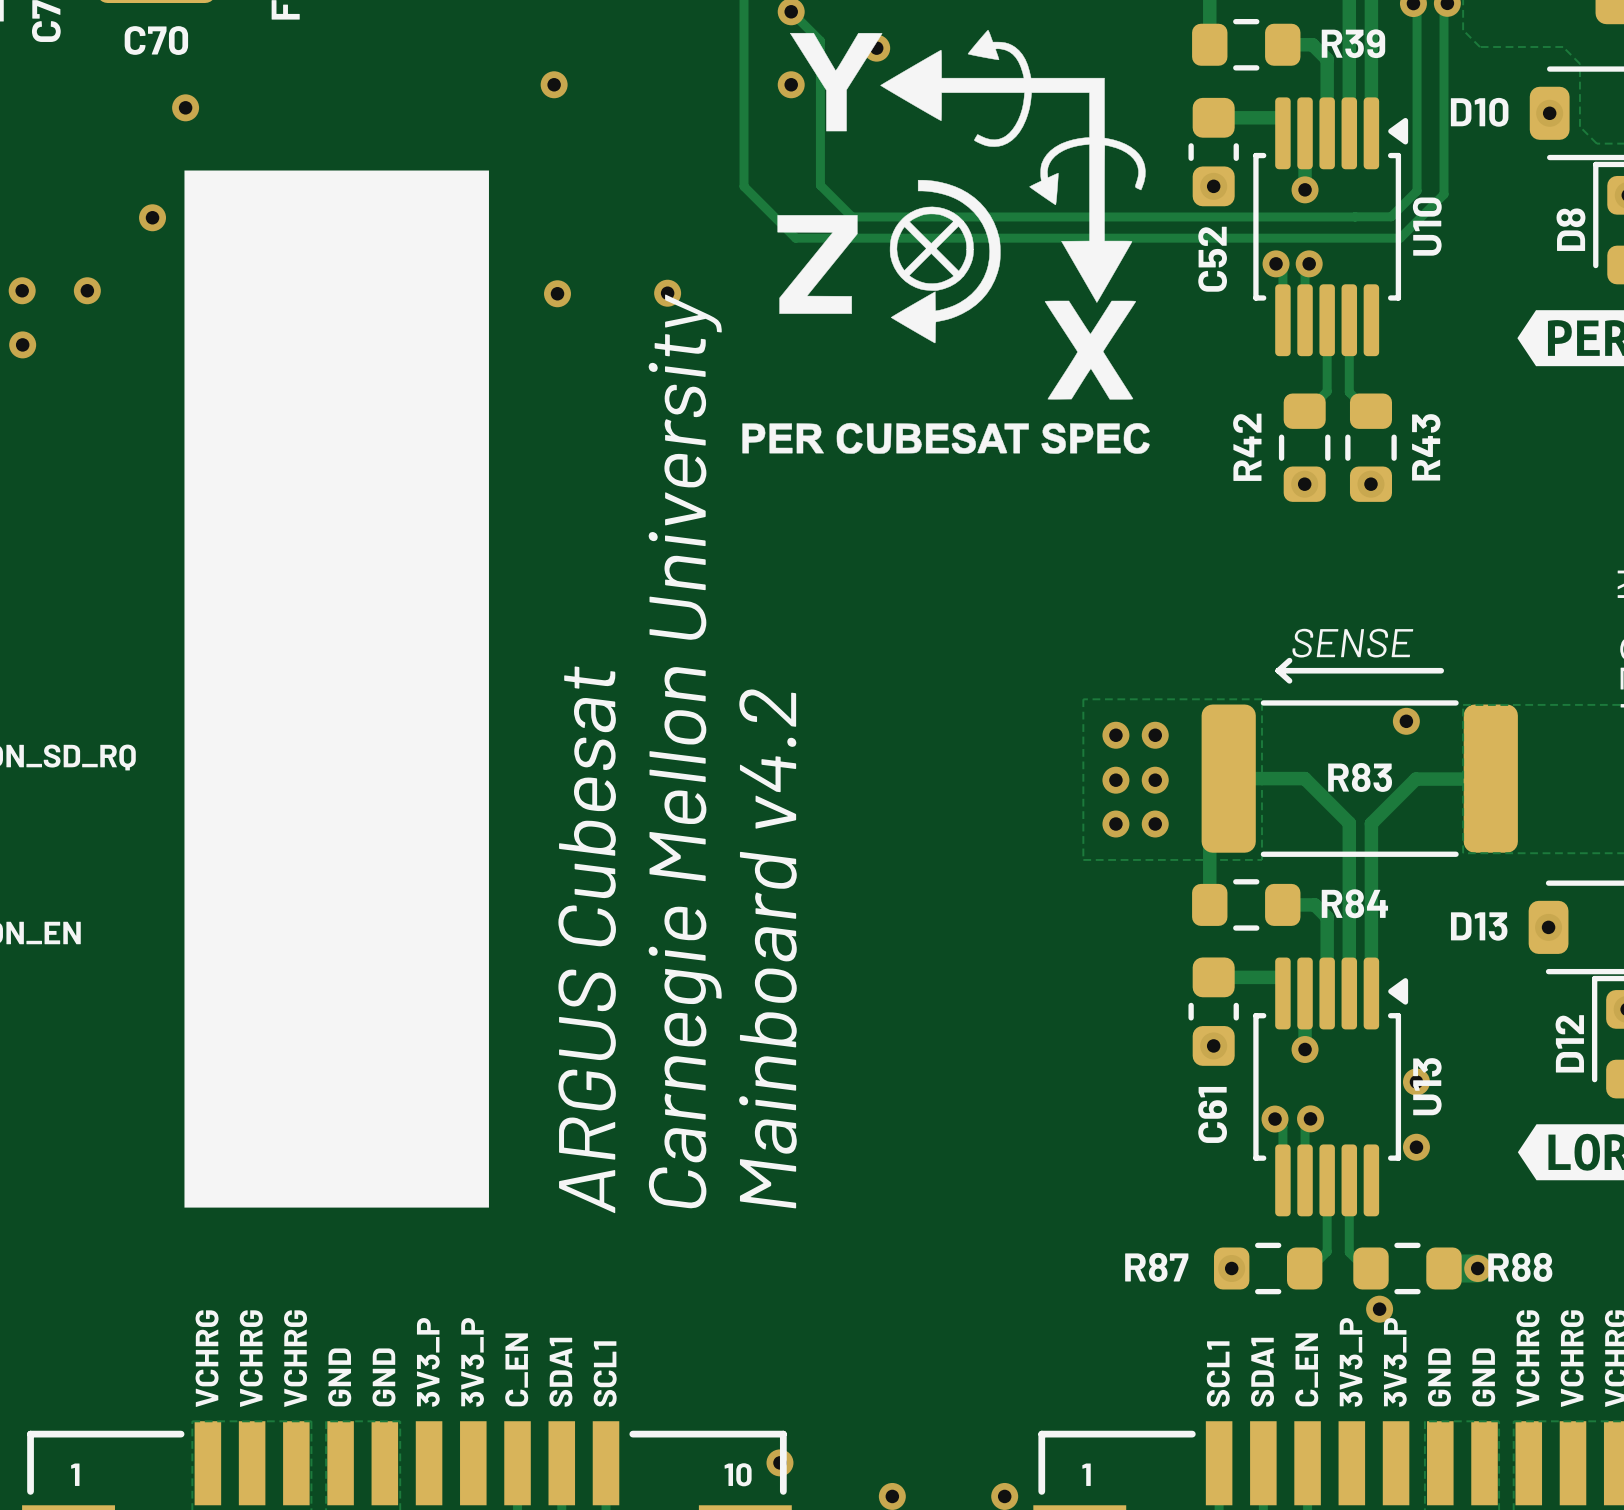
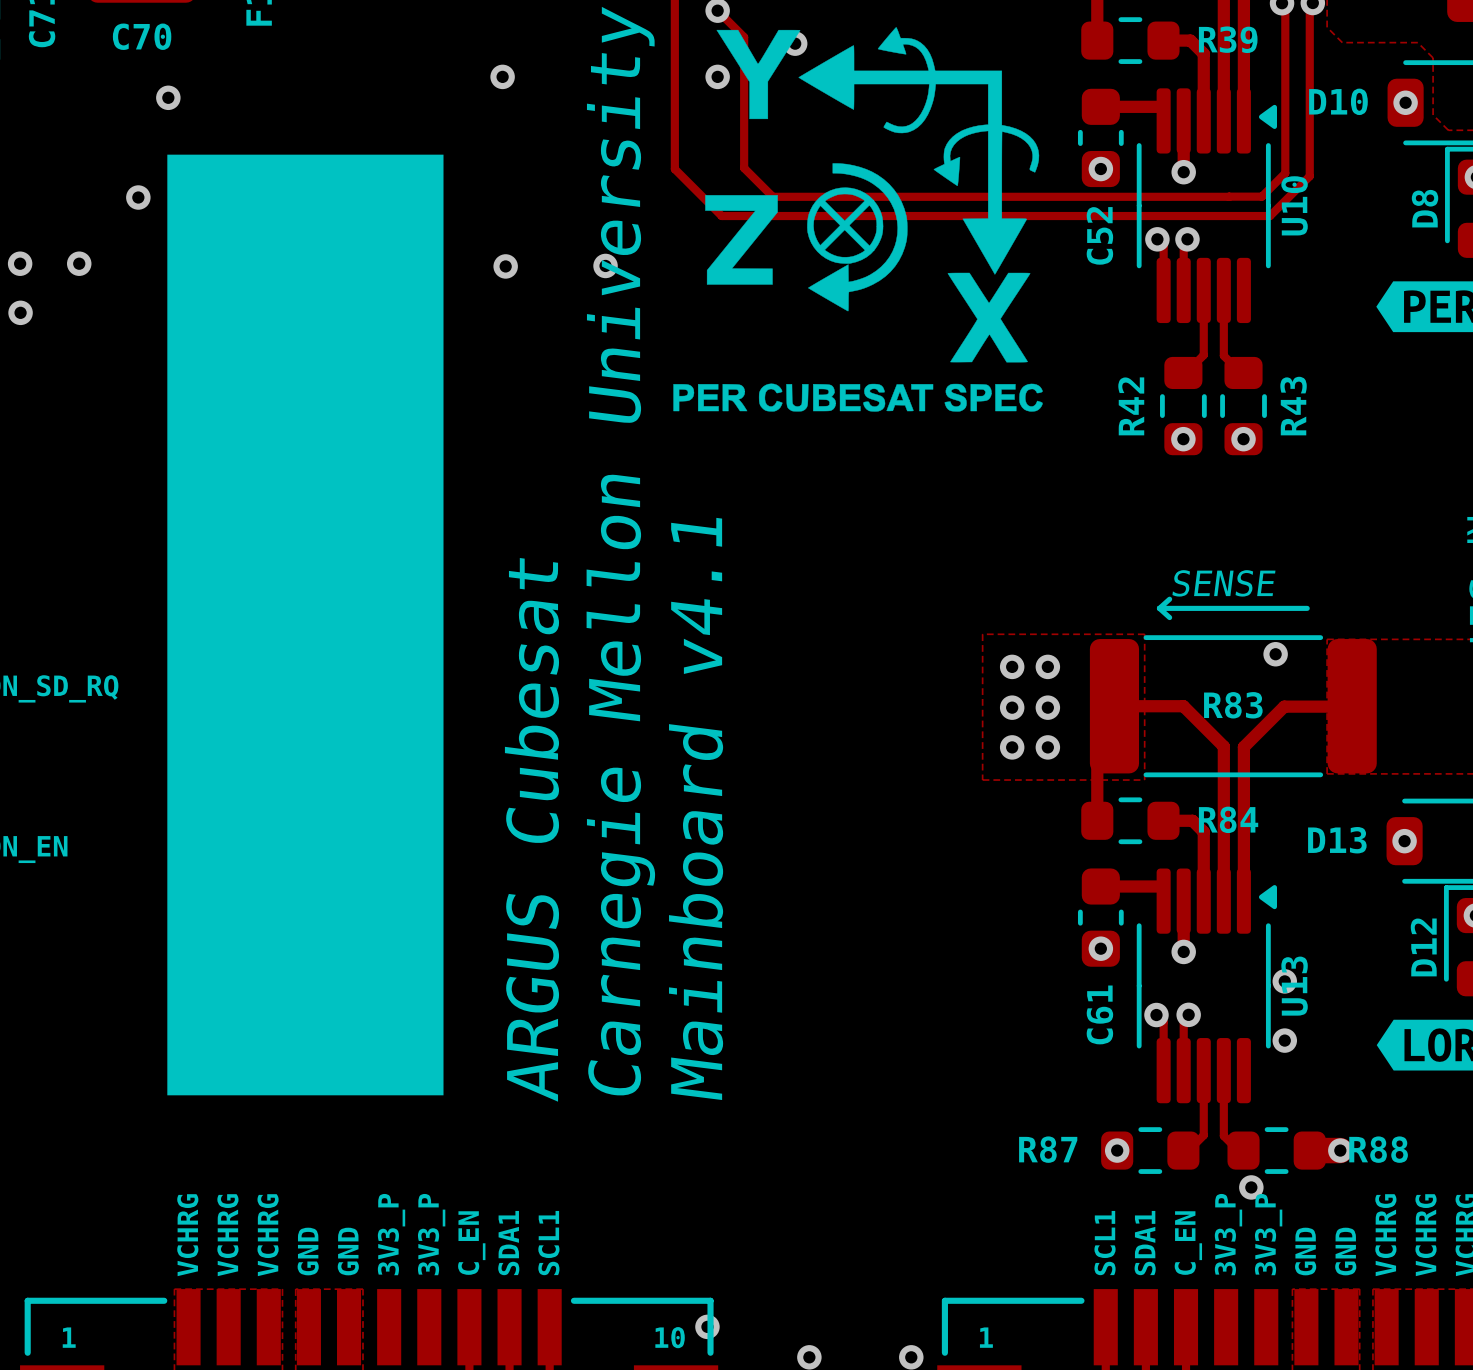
U10 footprint: [1253, 97, 1409, 357] -> [1136, 88, 1278, 324]
text: Mainboard v4.2 (767, 948) -> Mainboard v4.1 (696, 808)
U13 footprint: [1253, 957, 1409, 1217] -> [1136, 868, 1278, 1104]

